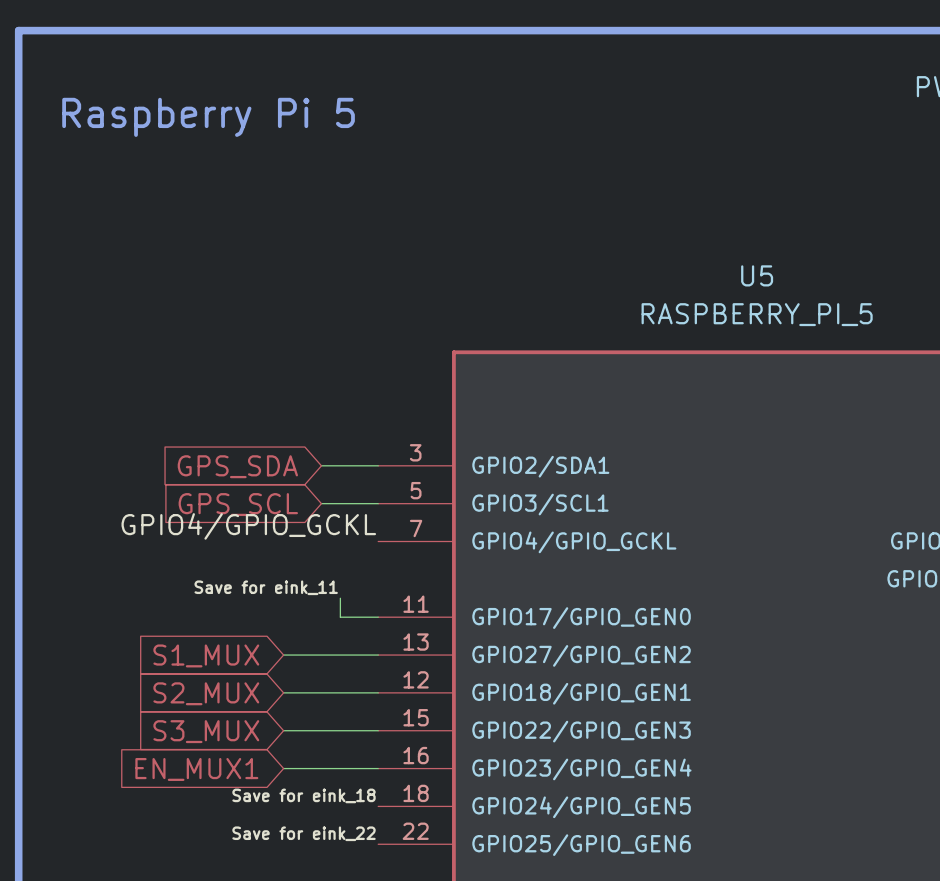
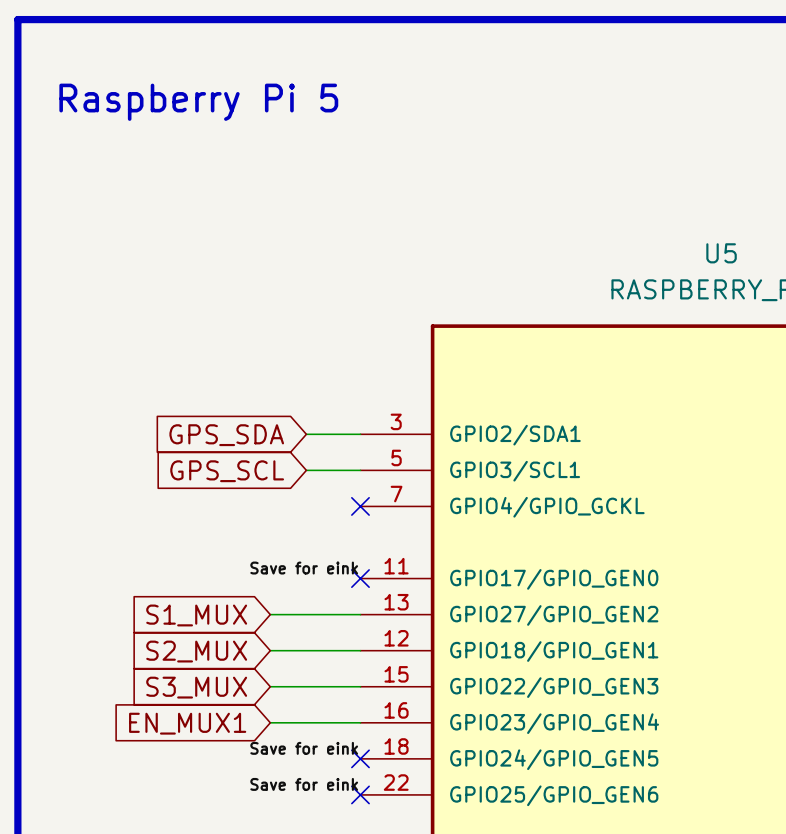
label: GPIO4/GPIO_GCKL (248, 526) -> none
no-connect mark: none -> (360, 506)
label: Save for eink_11 (266, 587) -> Save for eink (304, 568)
wire: (340, 598) (340, 617) (378, 617) -> none
no-connect mark: none -> (360, 578)
label: Save for eink_18 (304, 795) -> Save for eink (304, 748)
no-connect mark: none -> (360, 758)
label: Save for eink_22 (304, 833) -> Save for eink (304, 784)
no-connect mark: none -> (360, 794)

